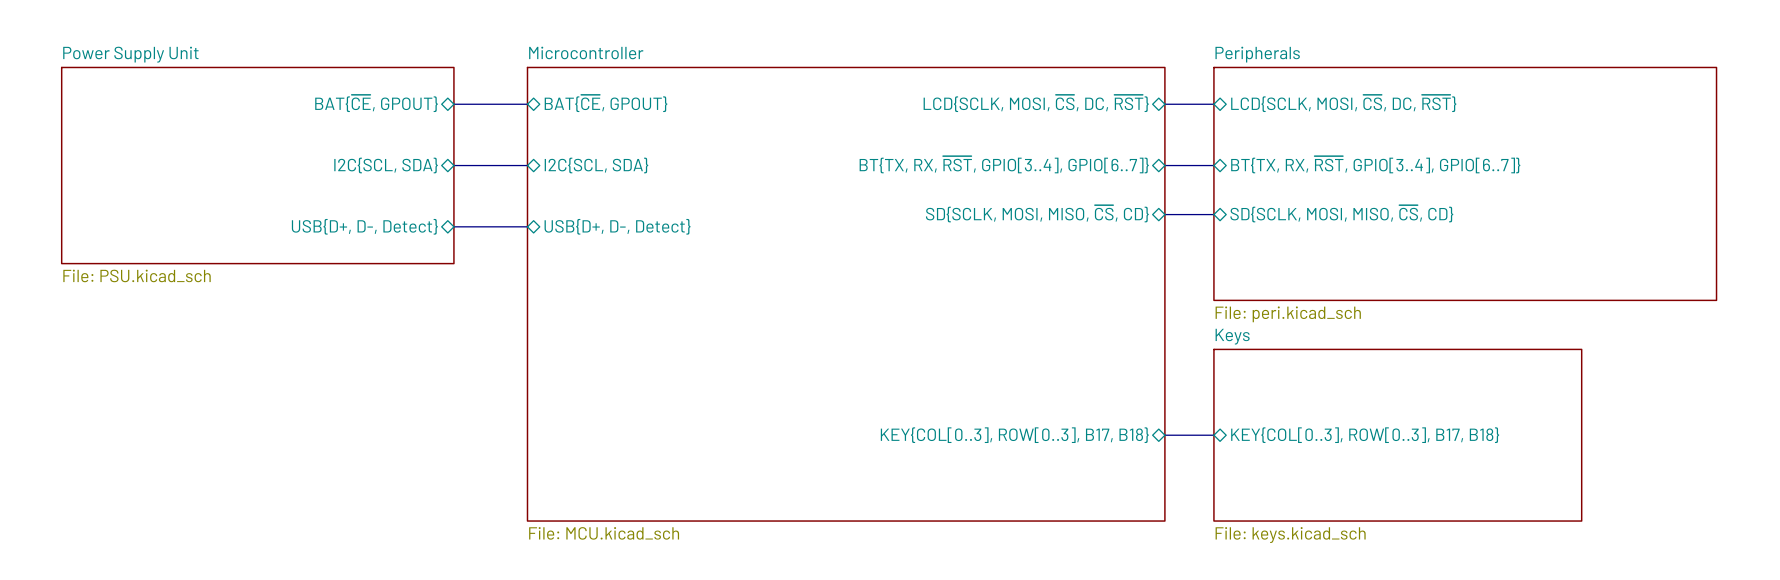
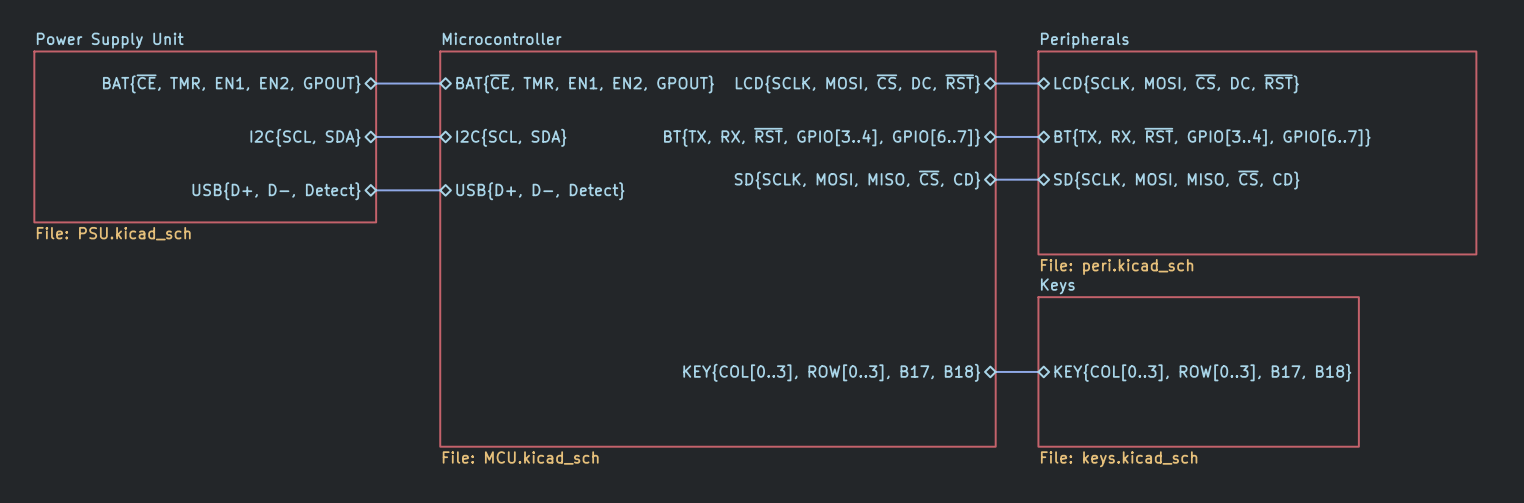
sheet pin: BAT{~{CE}, GPOUT} (376, 103) -> BAT{~{CE}, TMR, EN1, EN2, GPOUT} (231, 83)
sheet pin: BAT{~{CE}, GPOUT} (606, 103) -> BAT{~{CE}, TMR, EN1, EN2, GPOUT} (585, 83)

